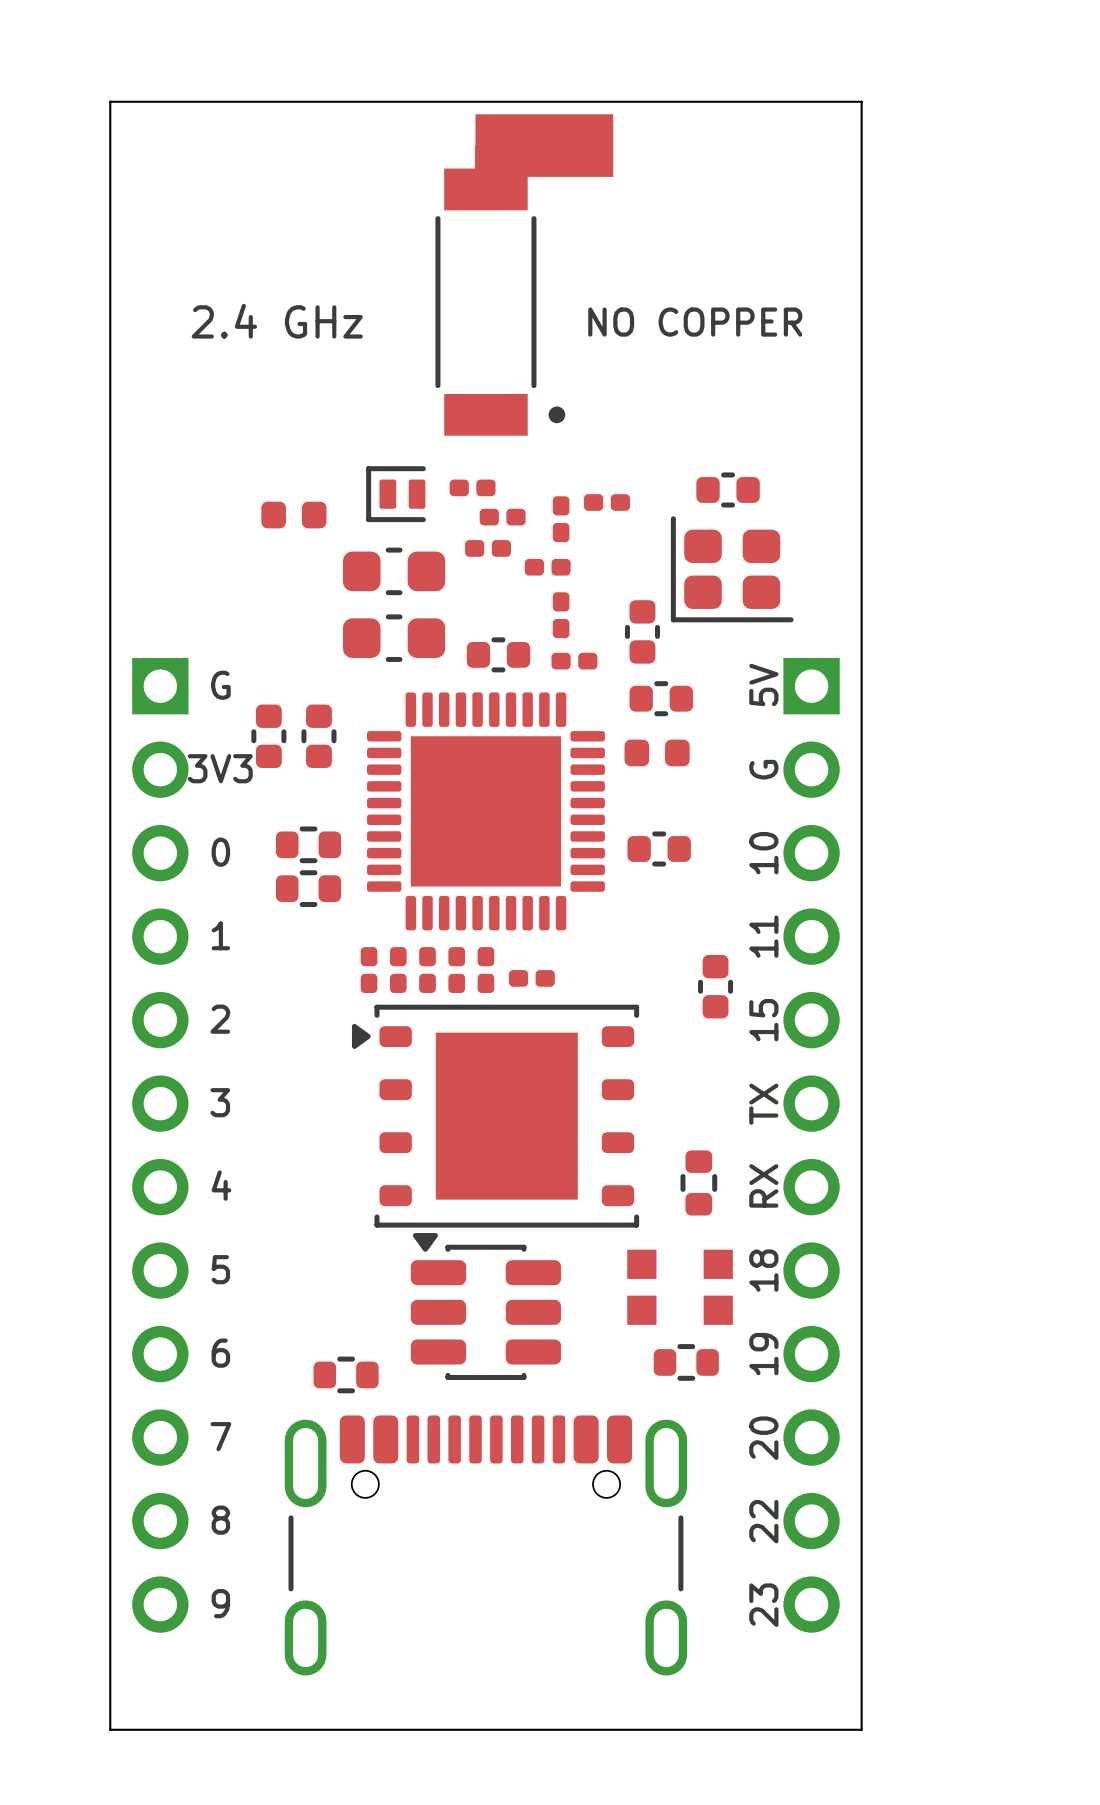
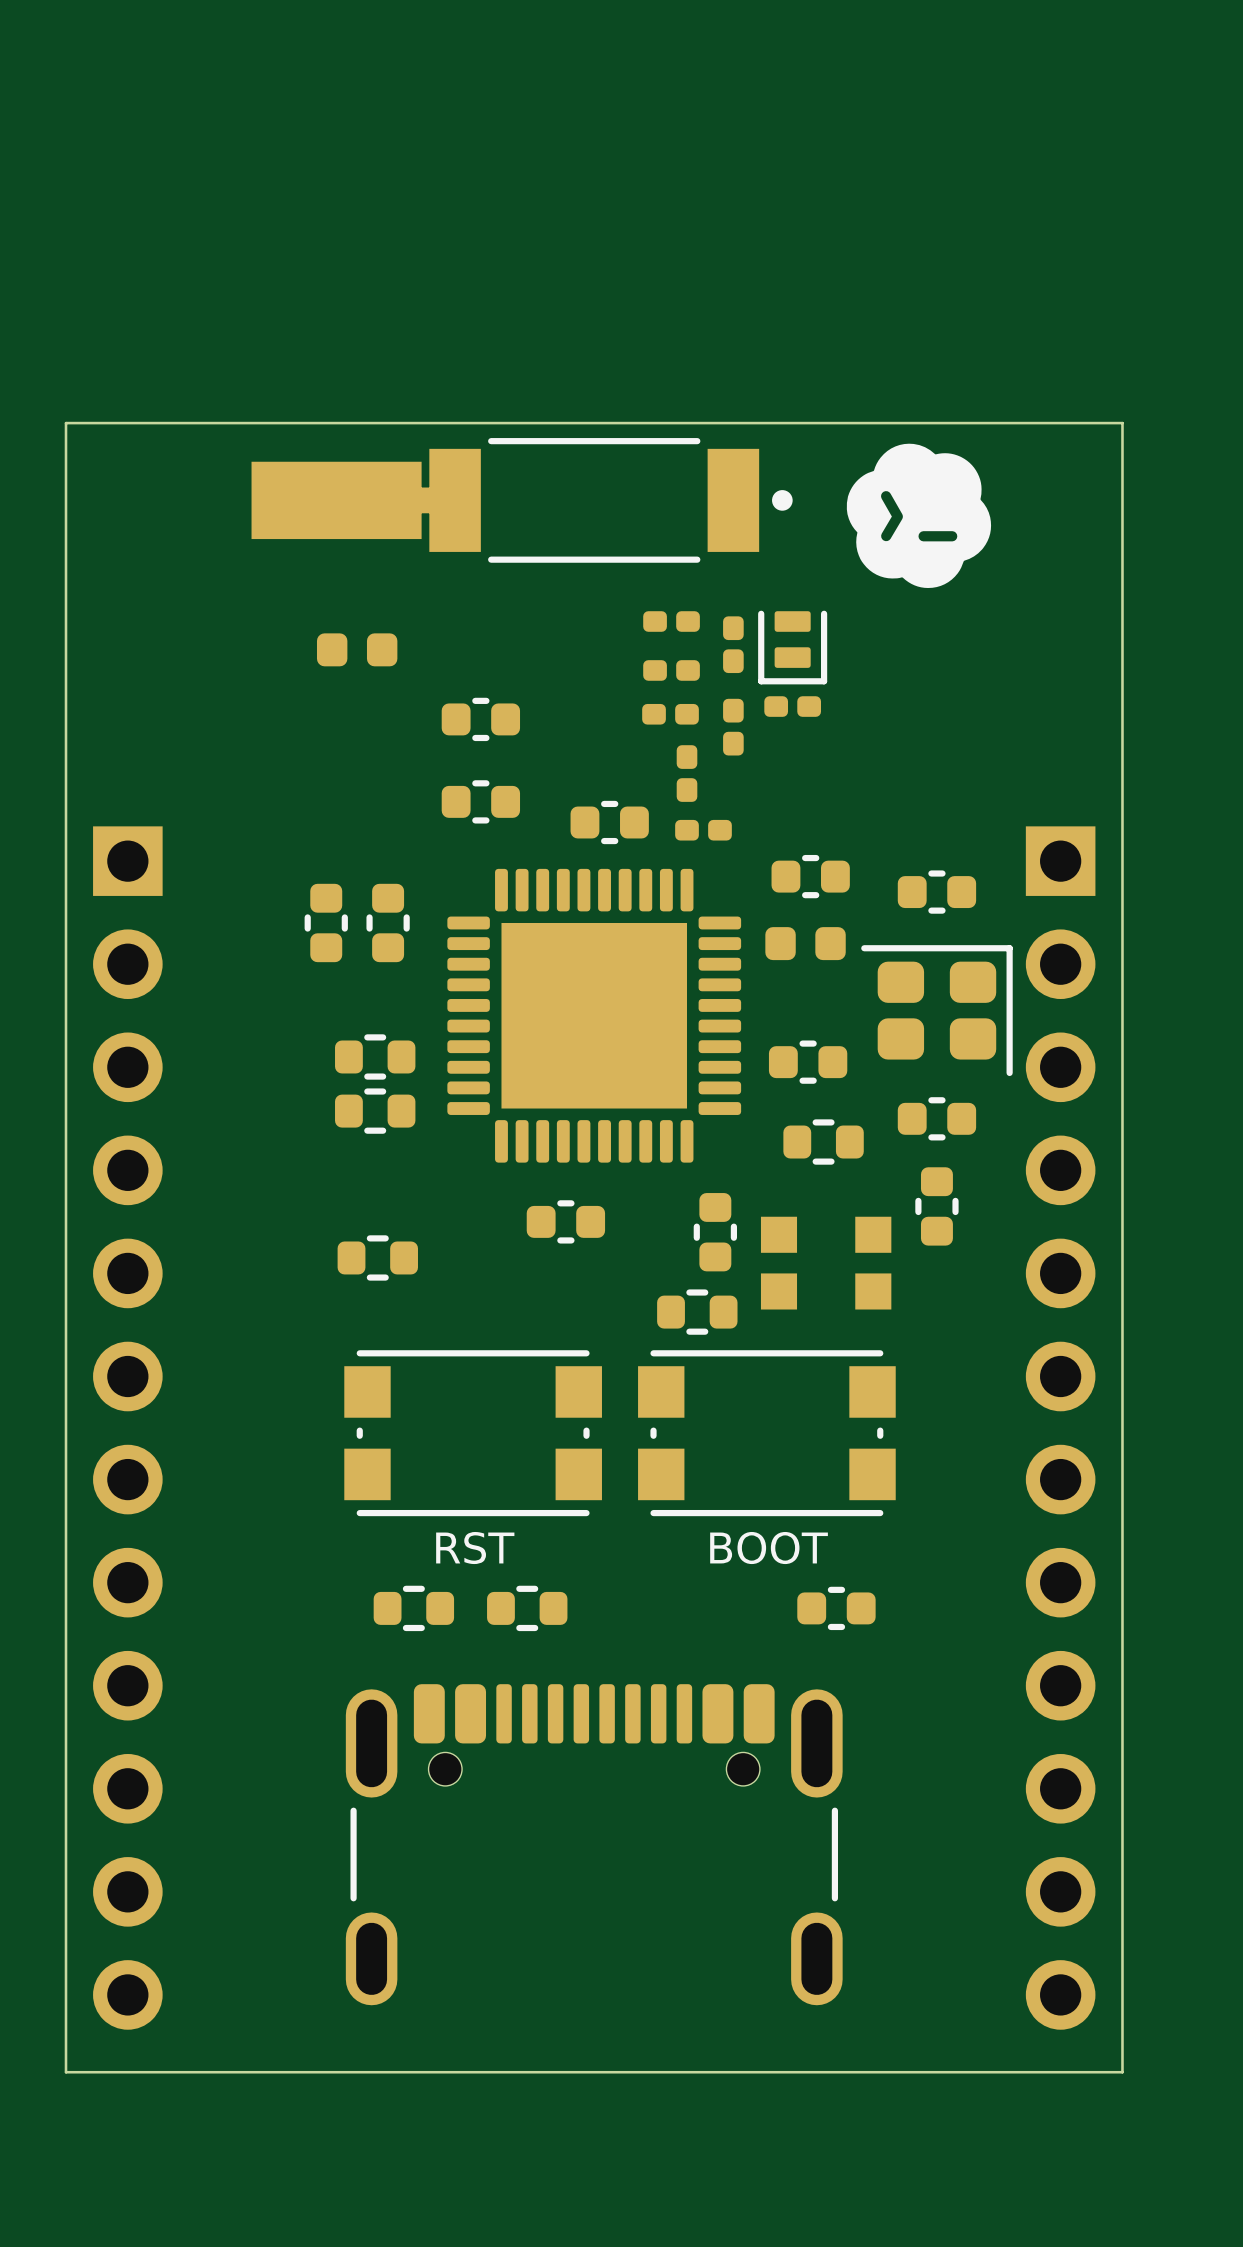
board edge: (110, 101) (861, 101) (861, 1729) (110, 1729) (110, 101) -> (66, 423) (66, 2072) (1122, 2072) (1122, 423) (66, 423)
part: (524, 275) -> none
text: 2.4 GHz (277, 321) -> none
text: NO COPPER (695, 322) -> none
drawing: none -> [846, 443, 992, 589]
part: none -> (522, 500)
part: (472, 487) -> none
part: (728, 489) -> none
part: none -> (671, 621)
part rotation: 0° (395, 494) -> 90° counterclockwise (792, 647)
part position: (395, 494) -> (792, 647)
part rotation: 0° (607, 502) -> 90° clockwise (733, 644)
part: (502, 517) -> none
part: (561, 519) -> none
part: none -> (671, 670)
part footprint: [342, 547, 446, 596] -> [441, 697, 521, 742]
part: (488, 548) -> none
part: none -> (792, 706)
part rotation: 0° (732, 569) -> 180° (936, 1010)
part position: (732, 569) -> (936, 1010)
part: none -> (733, 727)
part footprint: [342, 614, 446, 662] -> [441, 780, 521, 824]
part: (642, 631) -> none
text: 5V (763, 684) -> none
text: G (220, 685) -> none
part: none -> (936, 892)
text: 3V3 (220, 768) -> none
text: G (763, 769) -> none
text: 0 (220, 852) -> none
text: 10 (763, 853) -> none
part: none -> (936, 1118)
part: none -> (823, 1142)
text: 1 (220, 935) -> none
text: 11 (763, 936) -> none
part footprint: [448, 947, 466, 994] -> [526, 1200, 606, 1244]
part: none -> (936, 1206)
part: (369, 970) -> none
part: (398, 970) -> none
part: (427, 970) -> none
part: (485, 970) -> none
part: (531, 978) -> none
part: none -> (715, 1232)
part: (715, 986) -> none
part: none -> (377, 1257)
part: none -> (826, 1263)
text: 2 (220, 1019) -> none
text: 15 (763, 1020) -> none
part: none -> (697, 1312)
text: 3 (220, 1102) -> none
text: TX (763, 1104) -> none
part: (495, 1116) -> none
part position: (160, 1145) -> (127, 1428)
part position: (811, 1145) -> (1060, 1428)
part: none -> (473, 1433)
part: none -> (766, 1433)
part: (698, 1182) -> none
text: 4 (221, 1185) -> none
text: RX (763, 1185) -> none
text: none -> RST (475, 1548)
text: none -> BOOT (769, 1548)
part footprint: [627, 1249, 733, 1325] -> [797, 1586, 876, 1631]
text: 5 (220, 1269) -> none
text: 18 (763, 1270) -> none
part: none -> (413, 1608)
part: none -> (527, 1608)
part: (485, 1306) -> none
text: 6 (220, 1353) -> none
text: 19 (763, 1354) -> none
part: (686, 1362) -> none
part: (346, 1374) -> none
text: 7 (220, 1436) -> none
text: 20 (763, 1438) -> none
text: 8 (220, 1520) -> none
text: 22 (763, 1521) -> none
part position: (485, 1545) -> (594, 1844)
text: 9 (220, 1603) -> none
text: 23 (763, 1605) -> none

